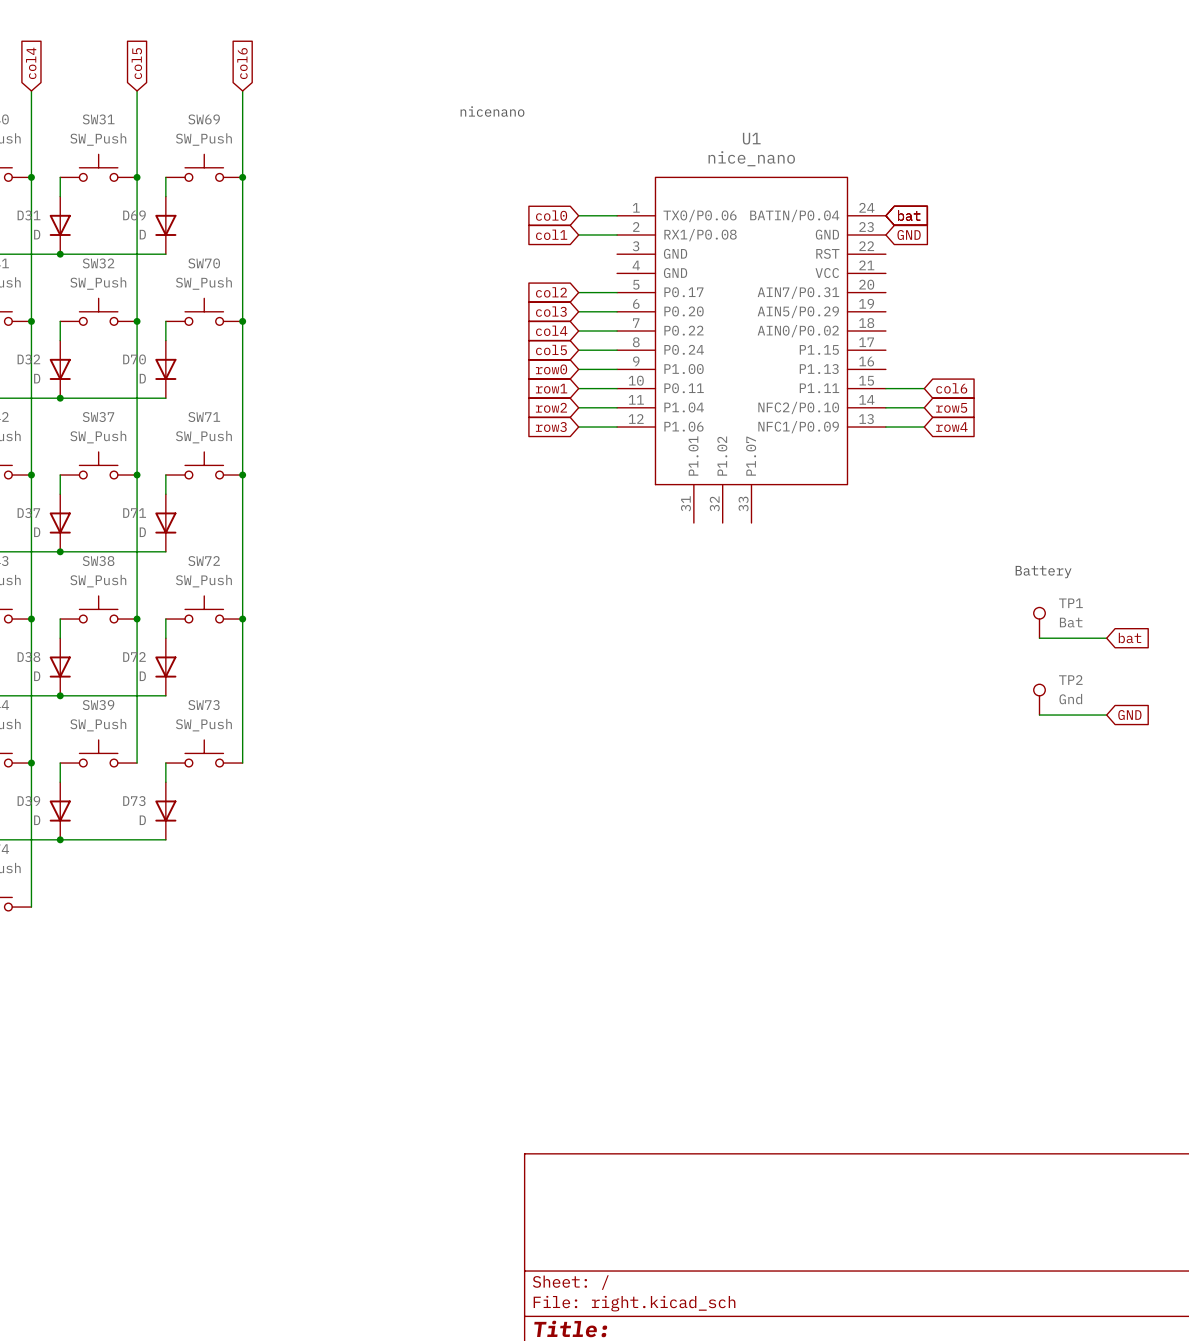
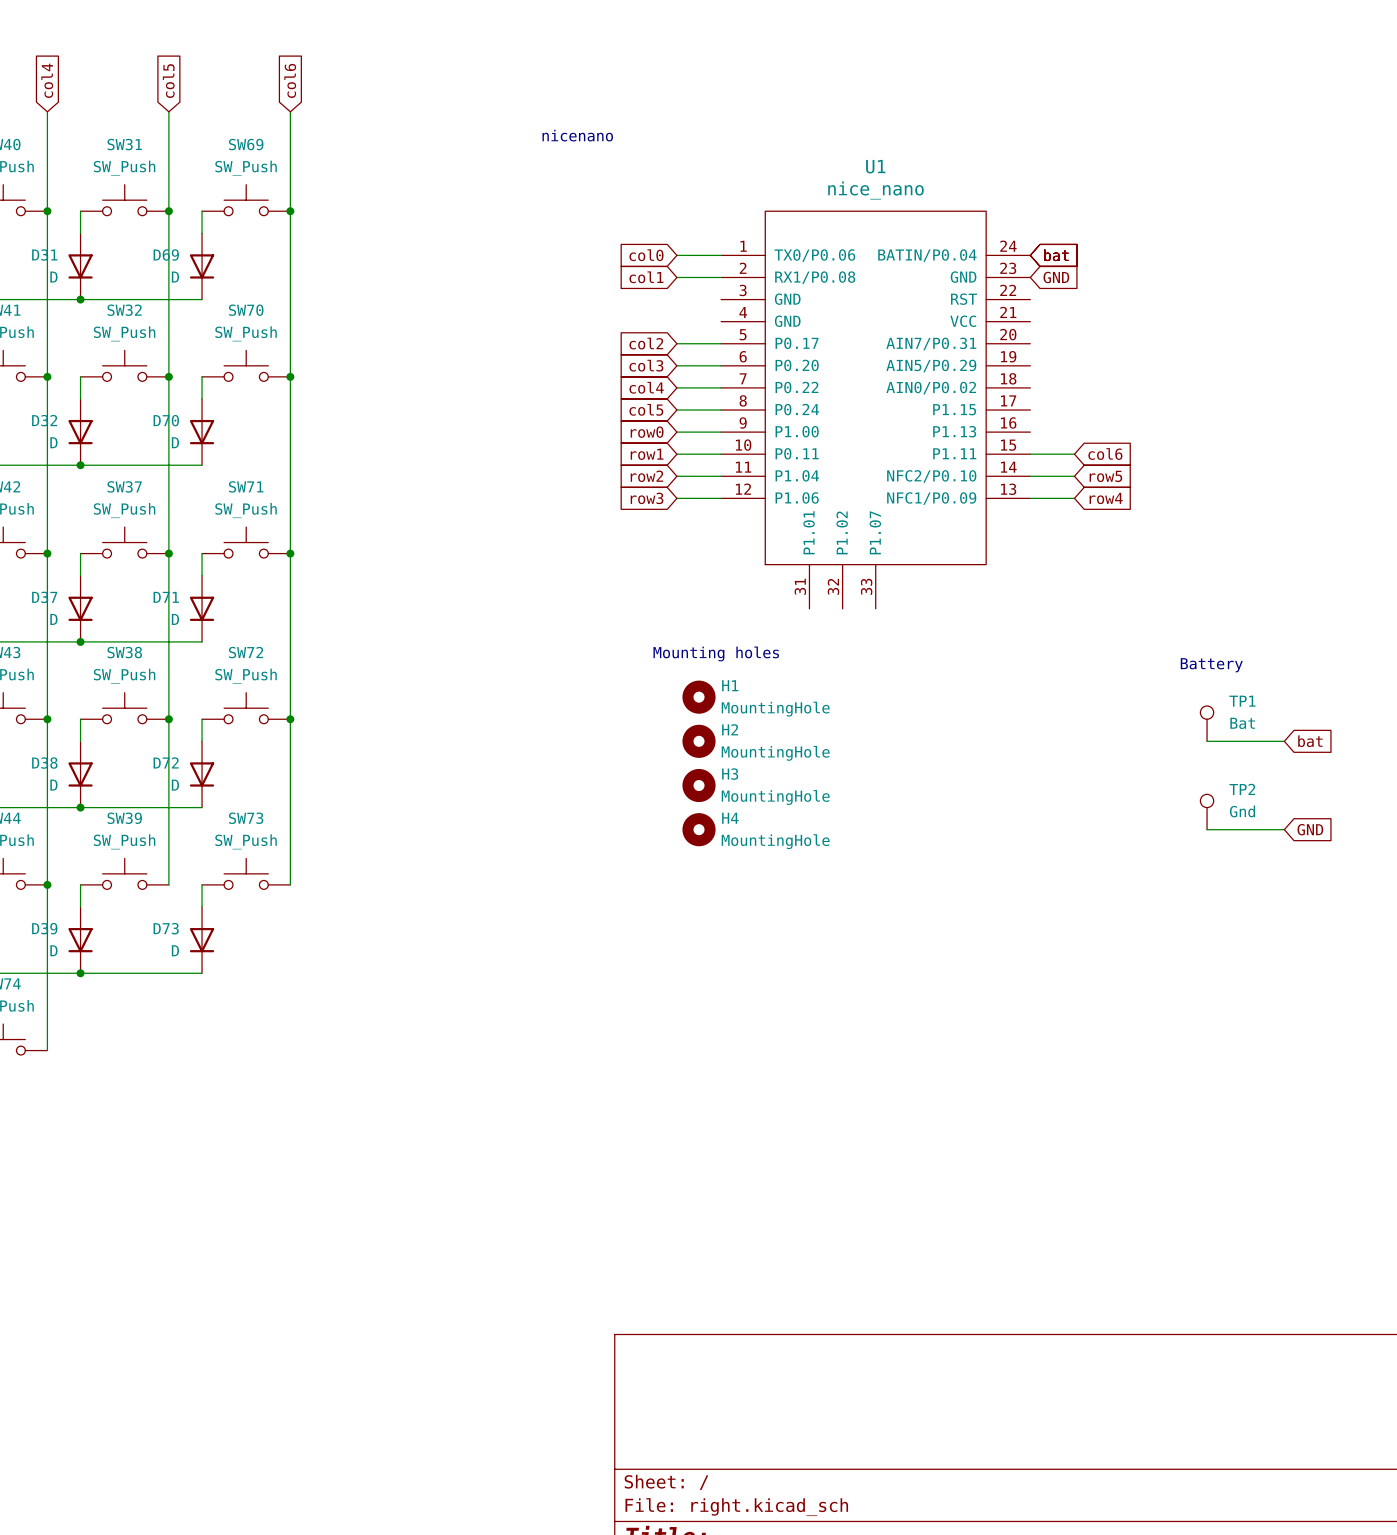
text: none -> Mounting holes (716, 653)
H1: none -> MountingHole (699, 697)
H2: none -> MountingHole (699, 741)
H3: none -> MountingHole (699, 785)
H4: none -> MountingHole (699, 829)

